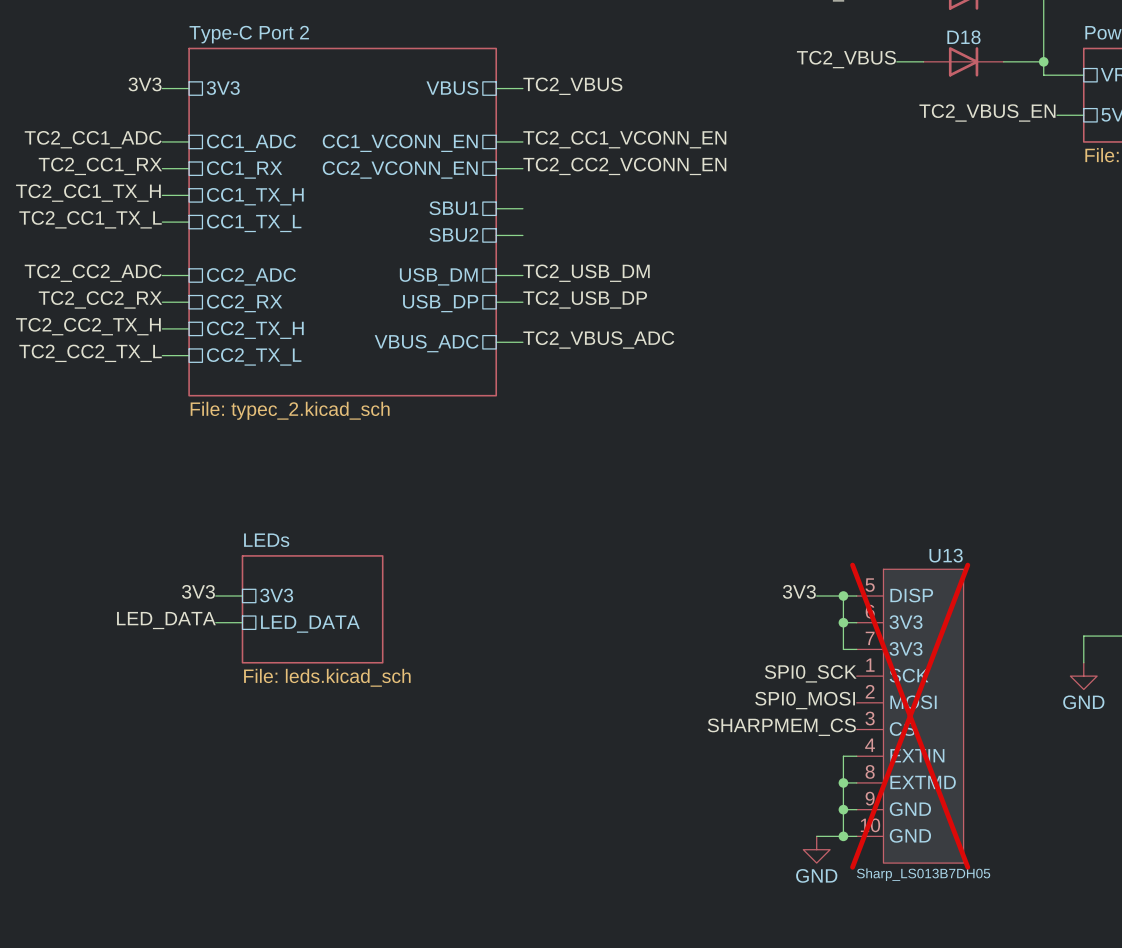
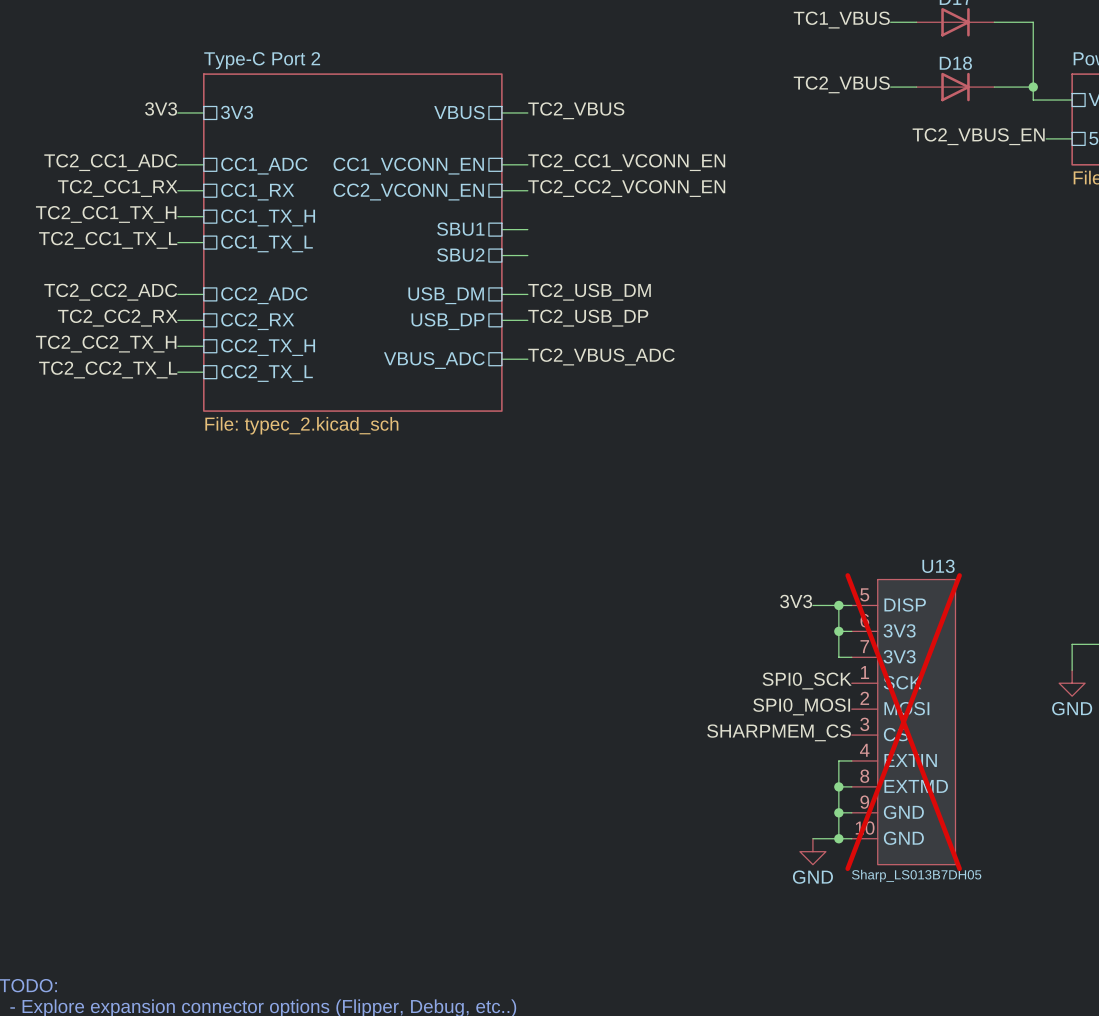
label: 3V3 (198, 591) -> none
wire: (215, 595) (242, 595) -> none
sheet pin: 3V3 (276, 595) -> none
sheet LEDs: File: leds.kicad_sch (312, 609) -> none
label: LED_DATA (166, 620) -> none
wire: (215, 622) (242, 622) -> none
sheet pin: LED_DATA (310, 624) -> none

